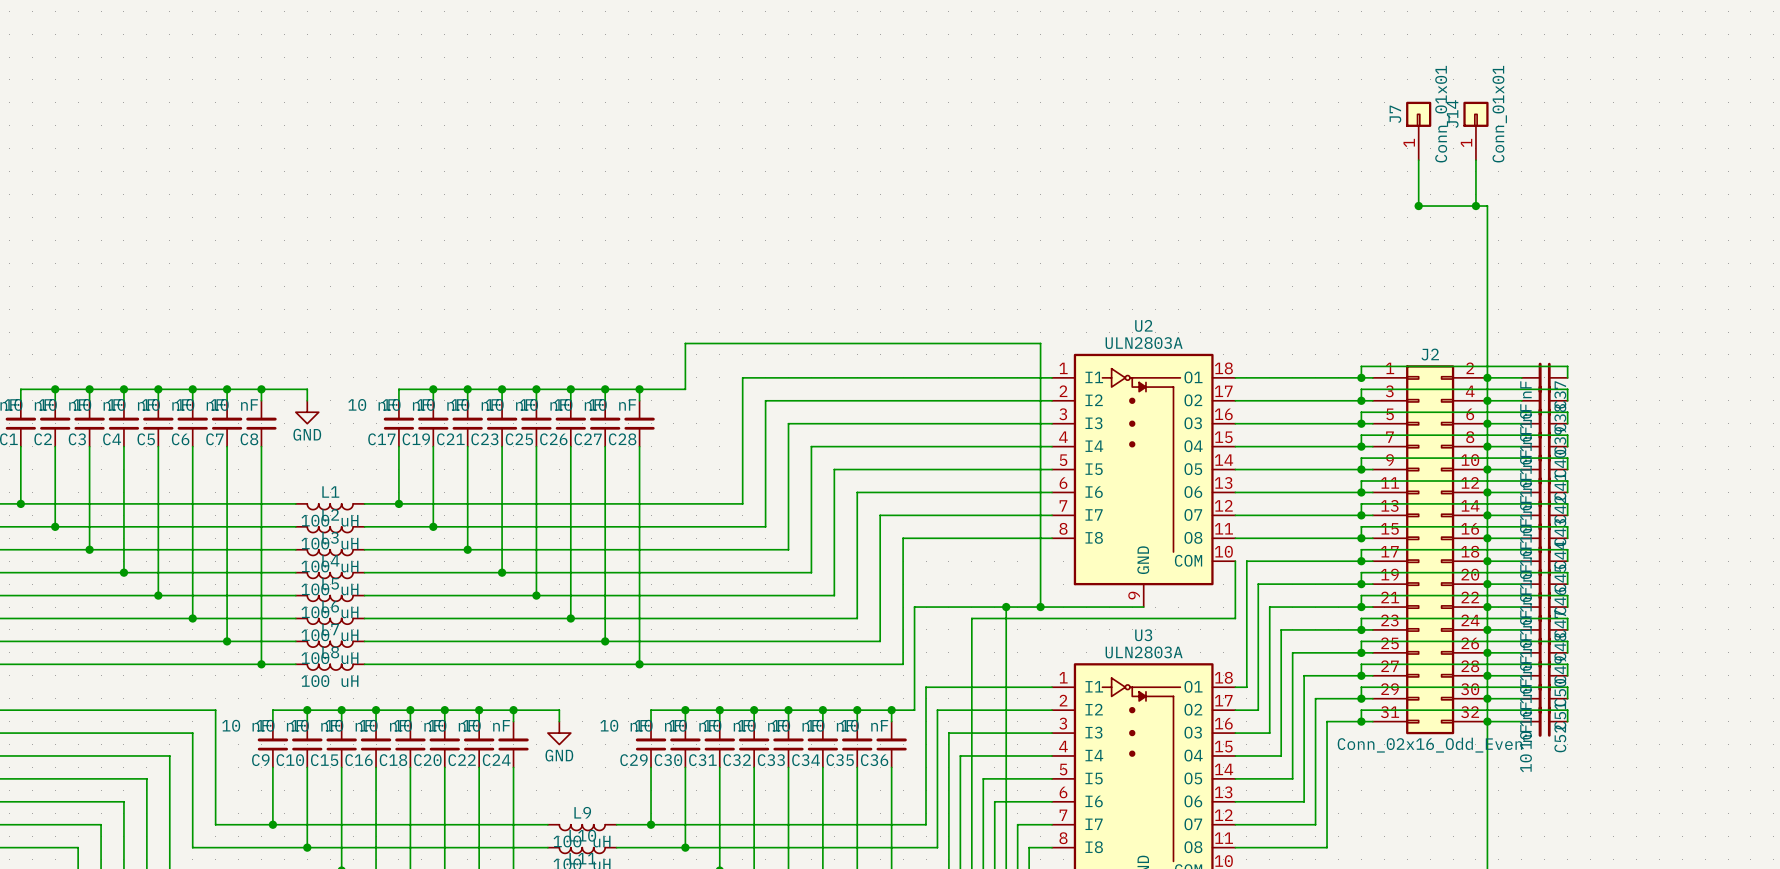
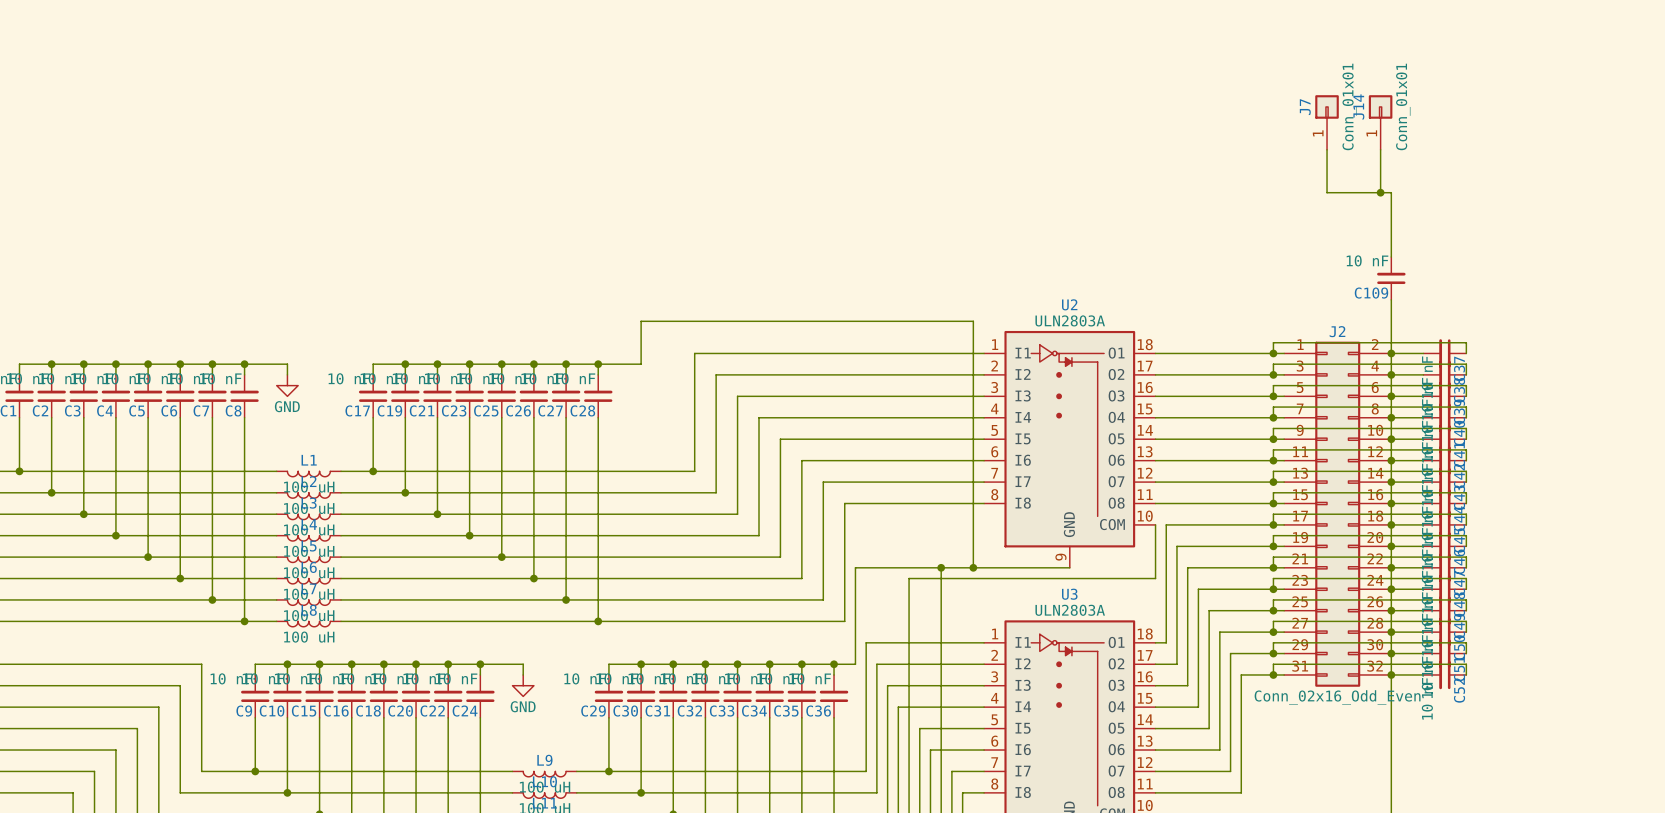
junction: (1418, 206) -> none
C109: none -> 10 nF (1391, 278)

